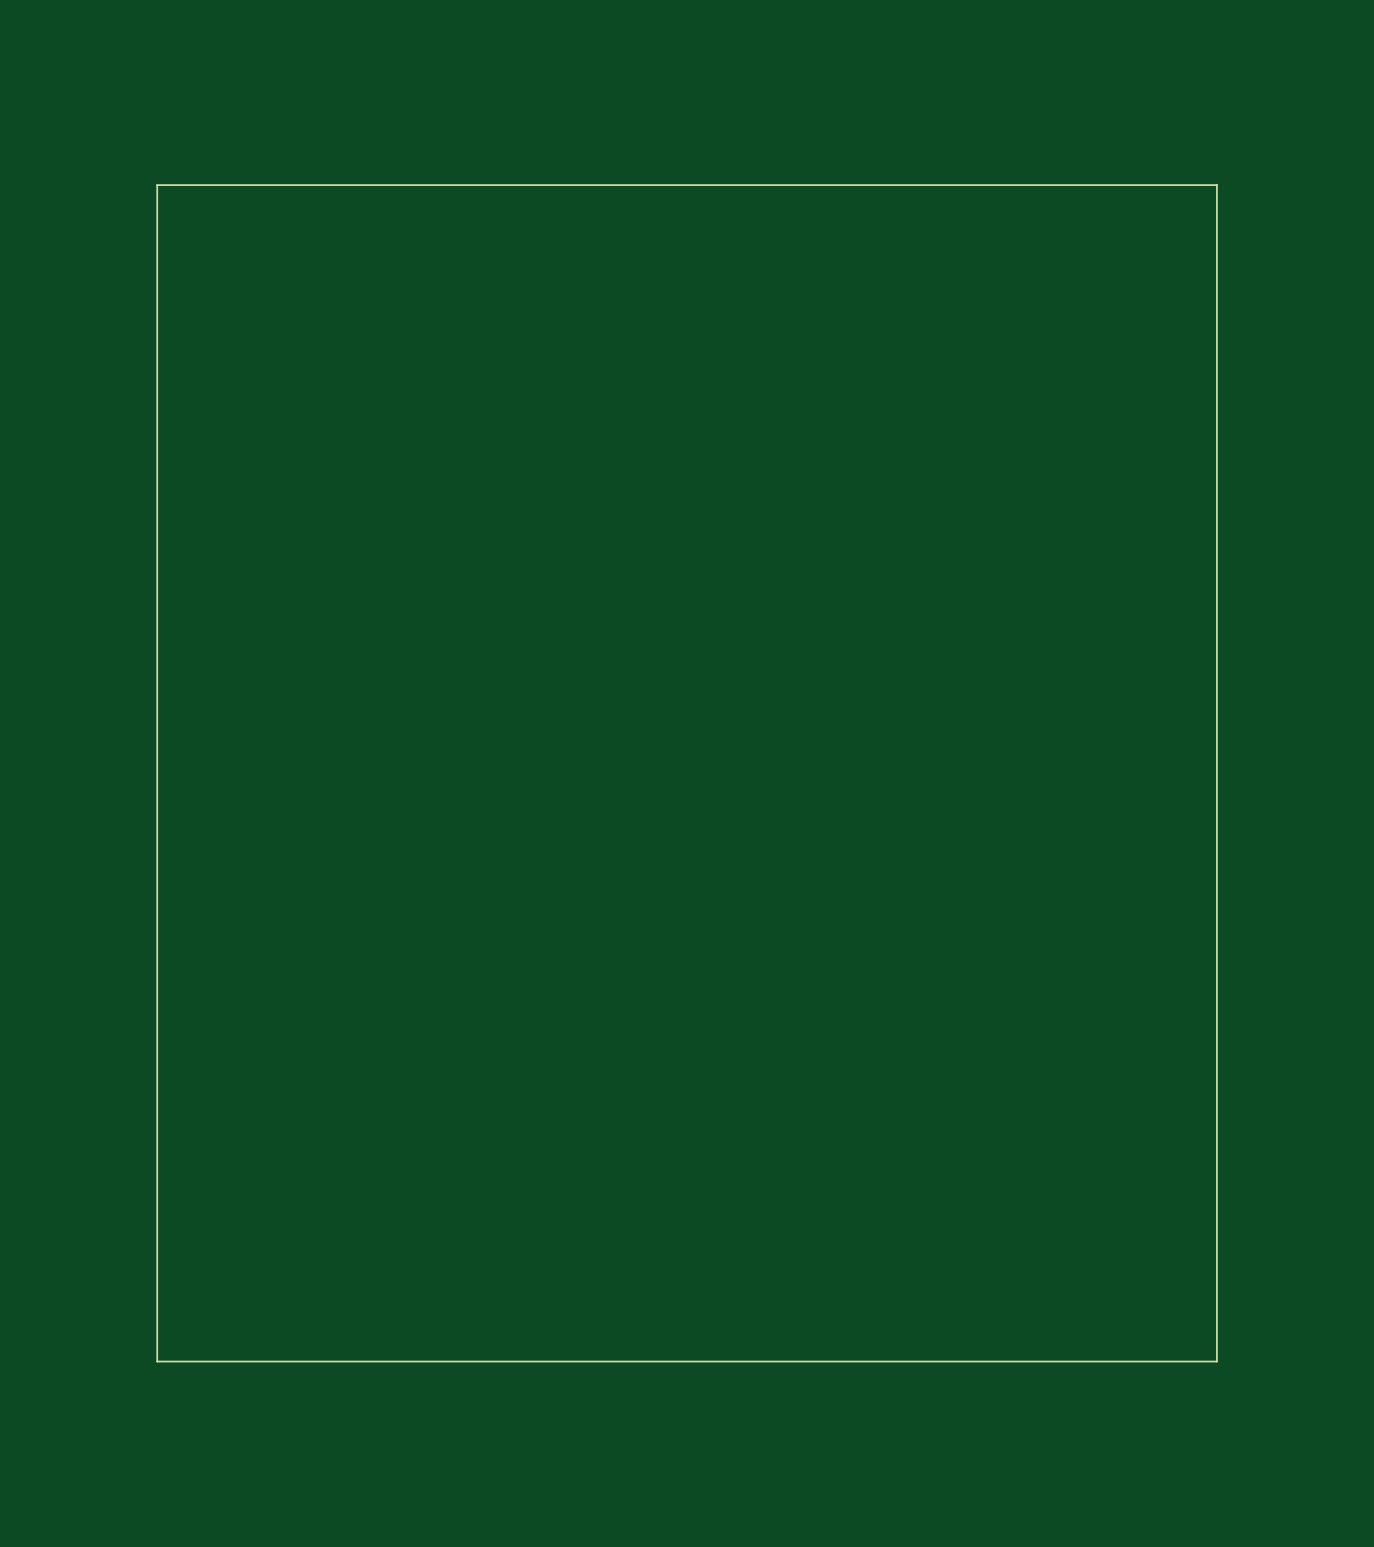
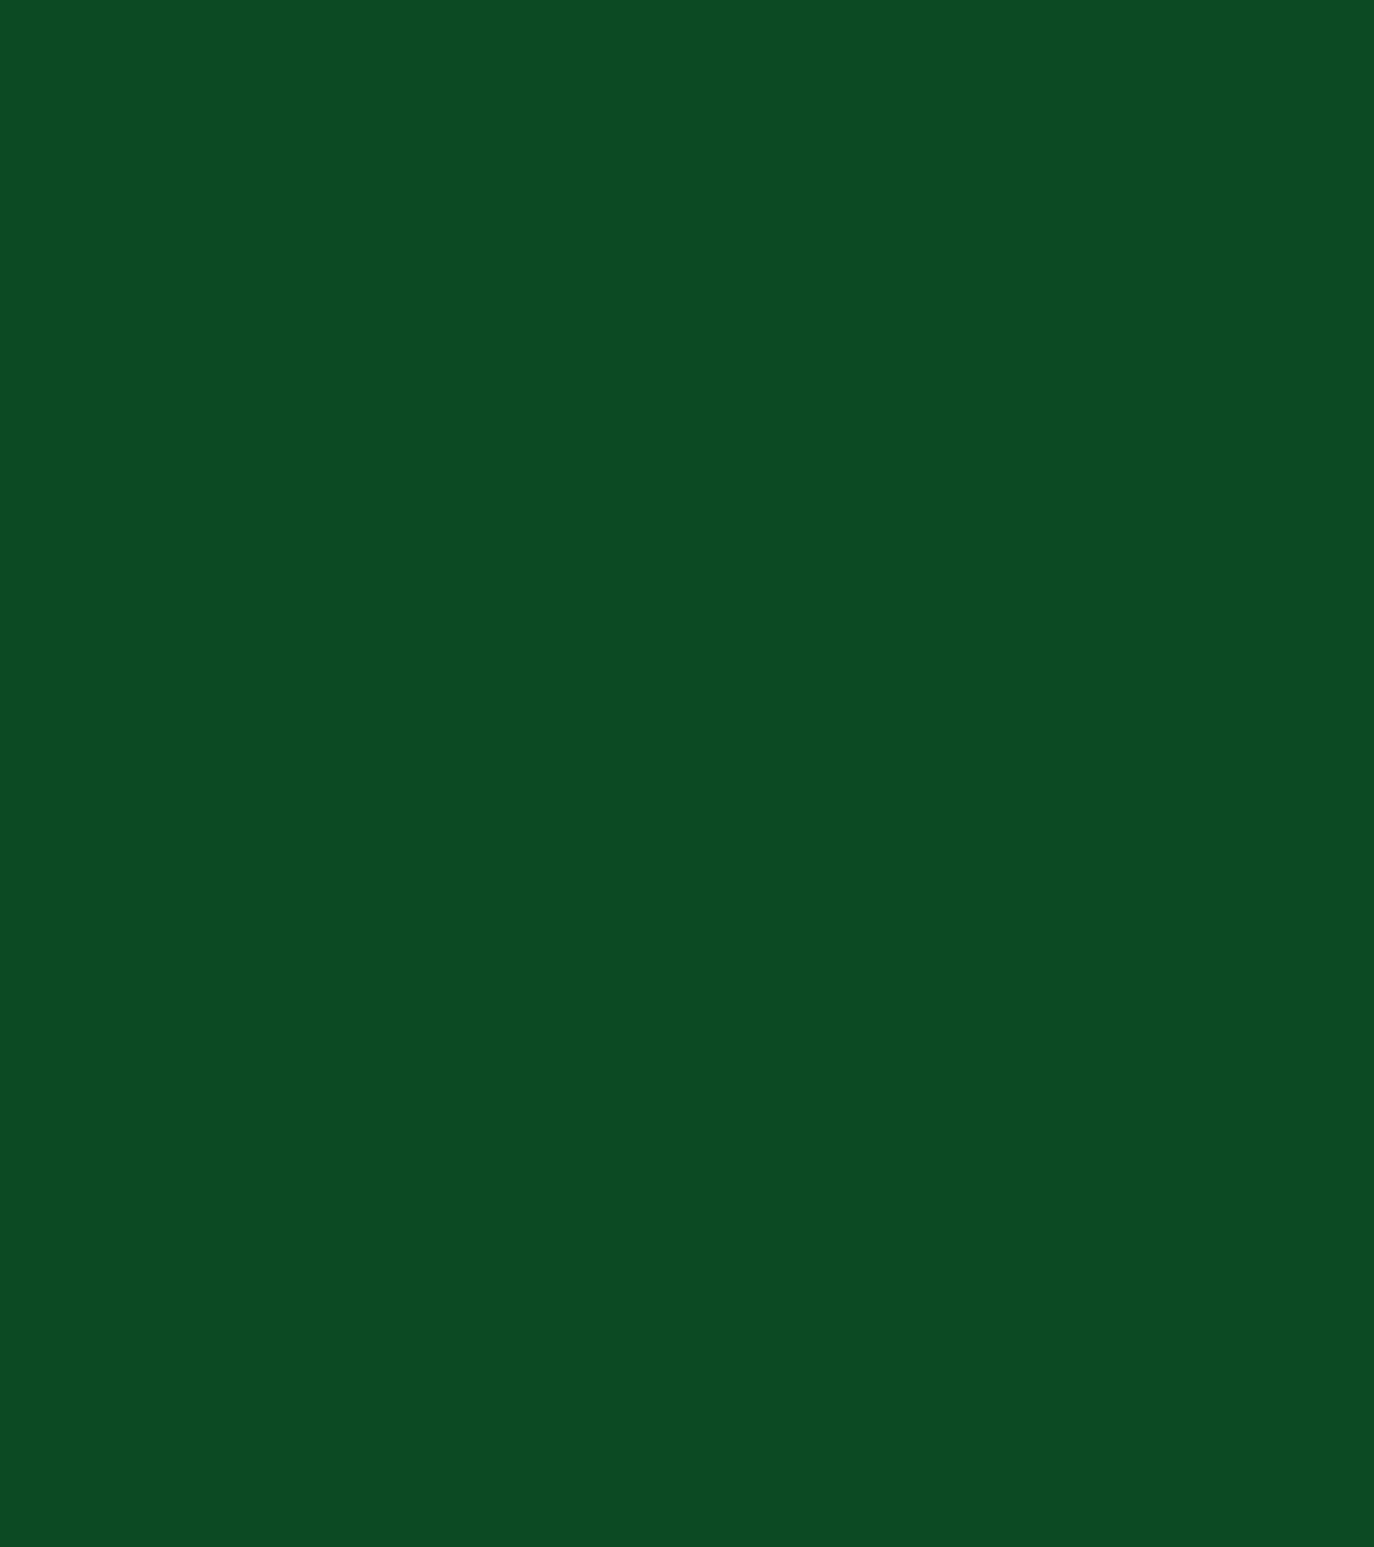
board edge: (1216, 185) (157, 185) (157, 1361) (1216, 1361) (1216, 185) -> none

